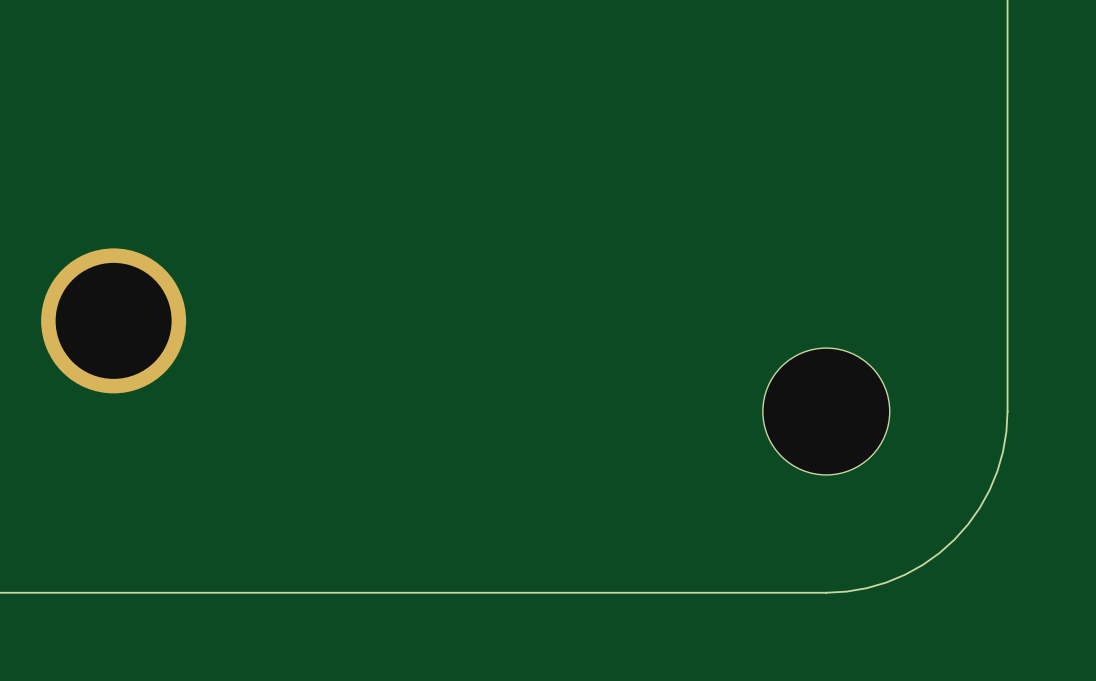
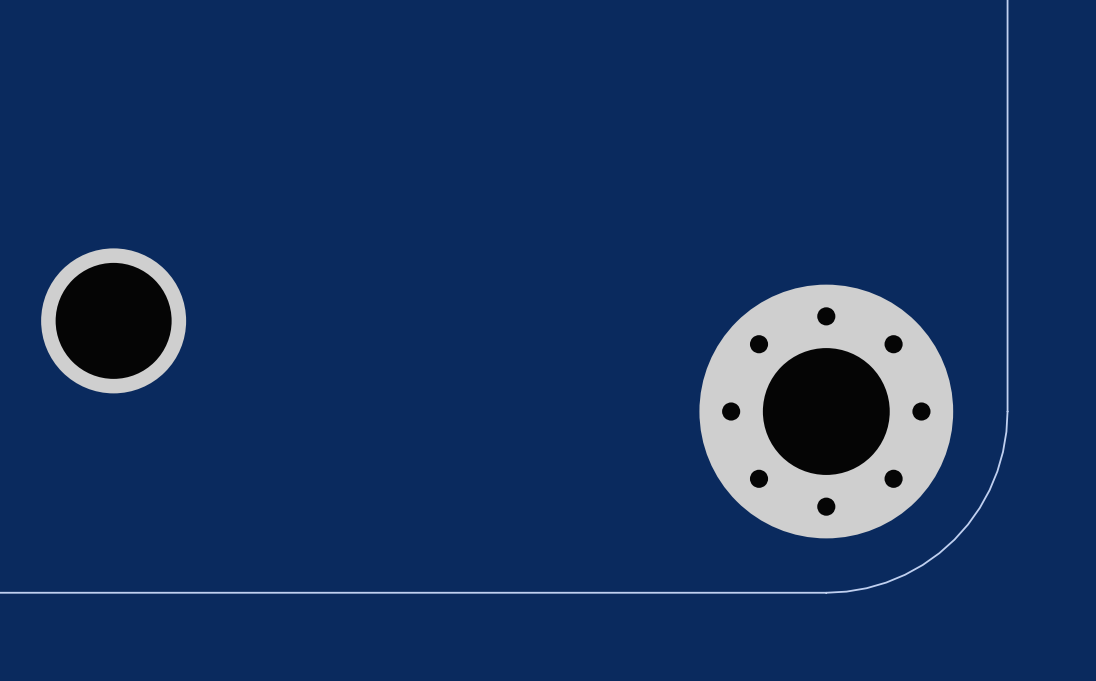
part footprint: [762, 348, 890, 475] -> [699, 284, 954, 539]

